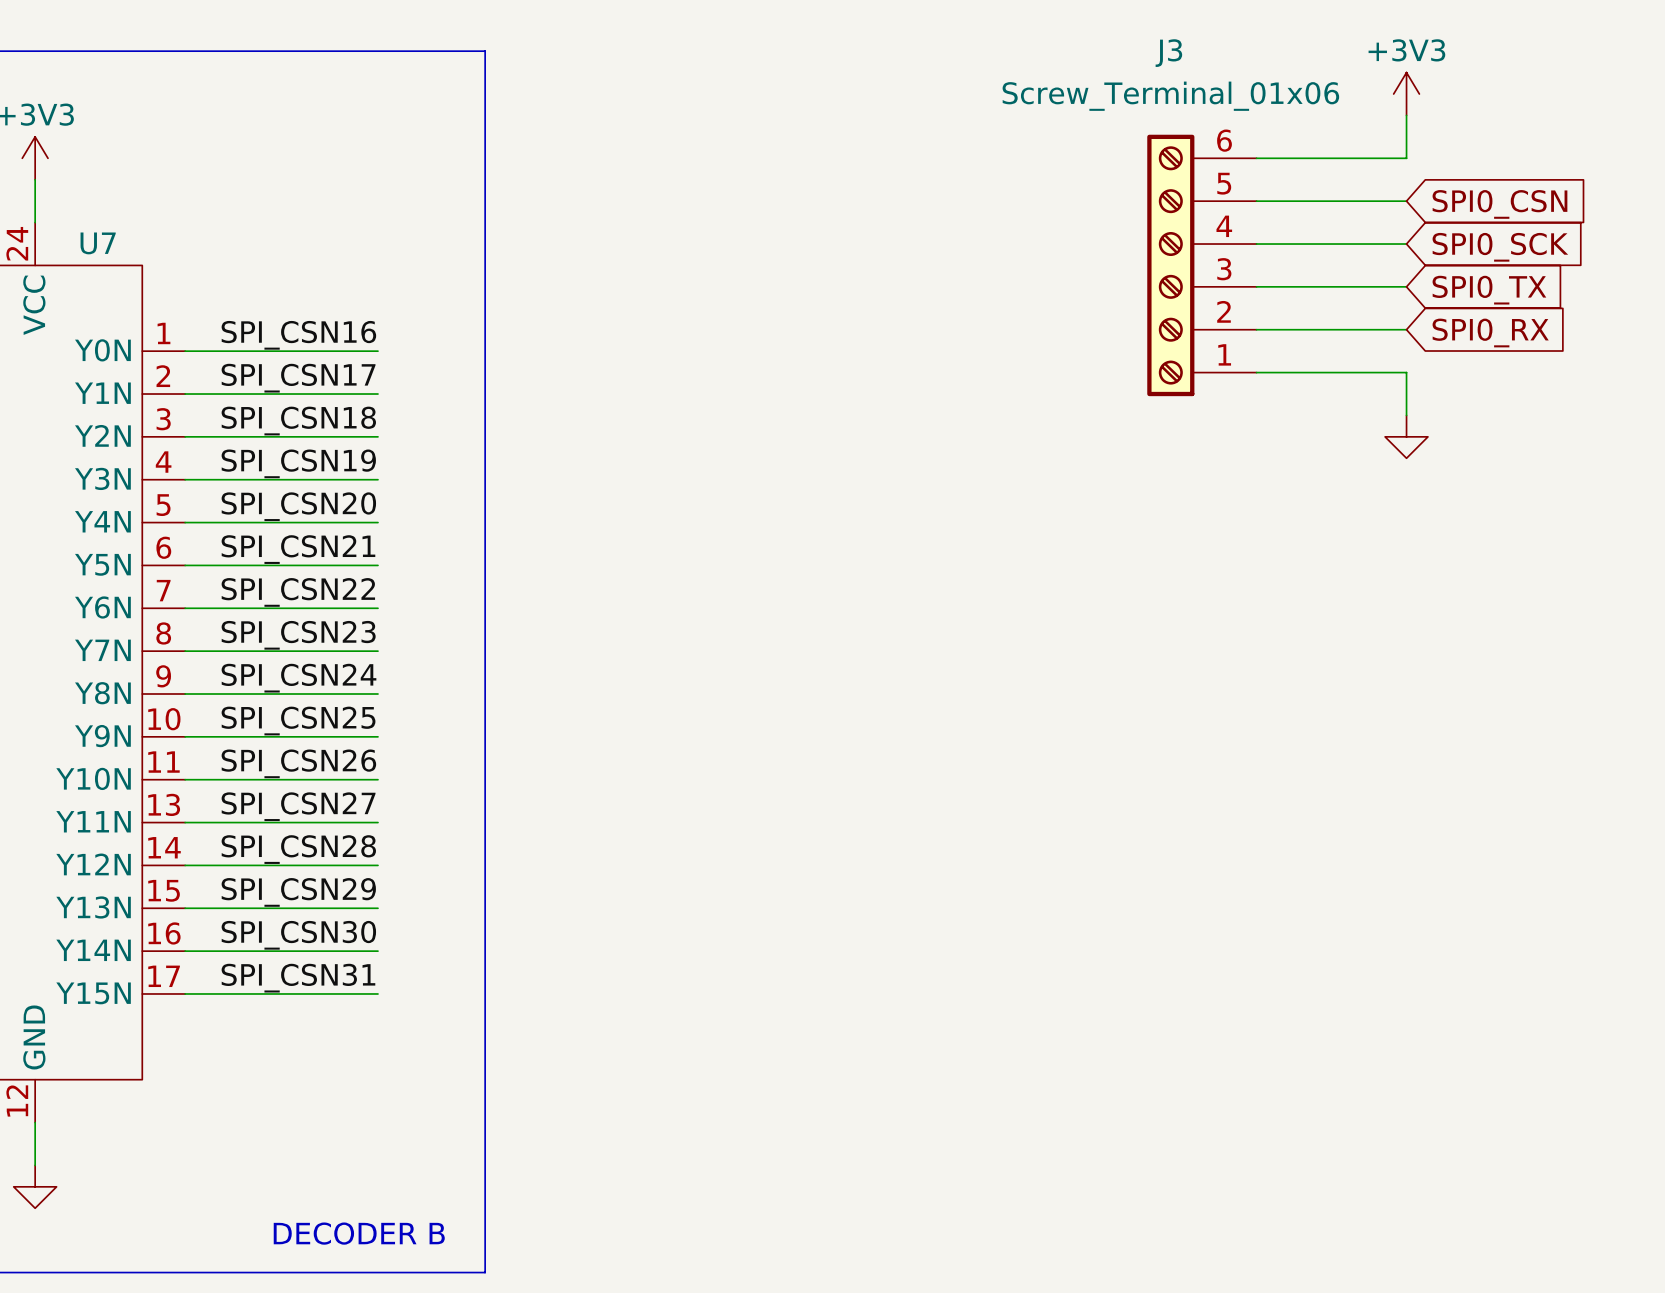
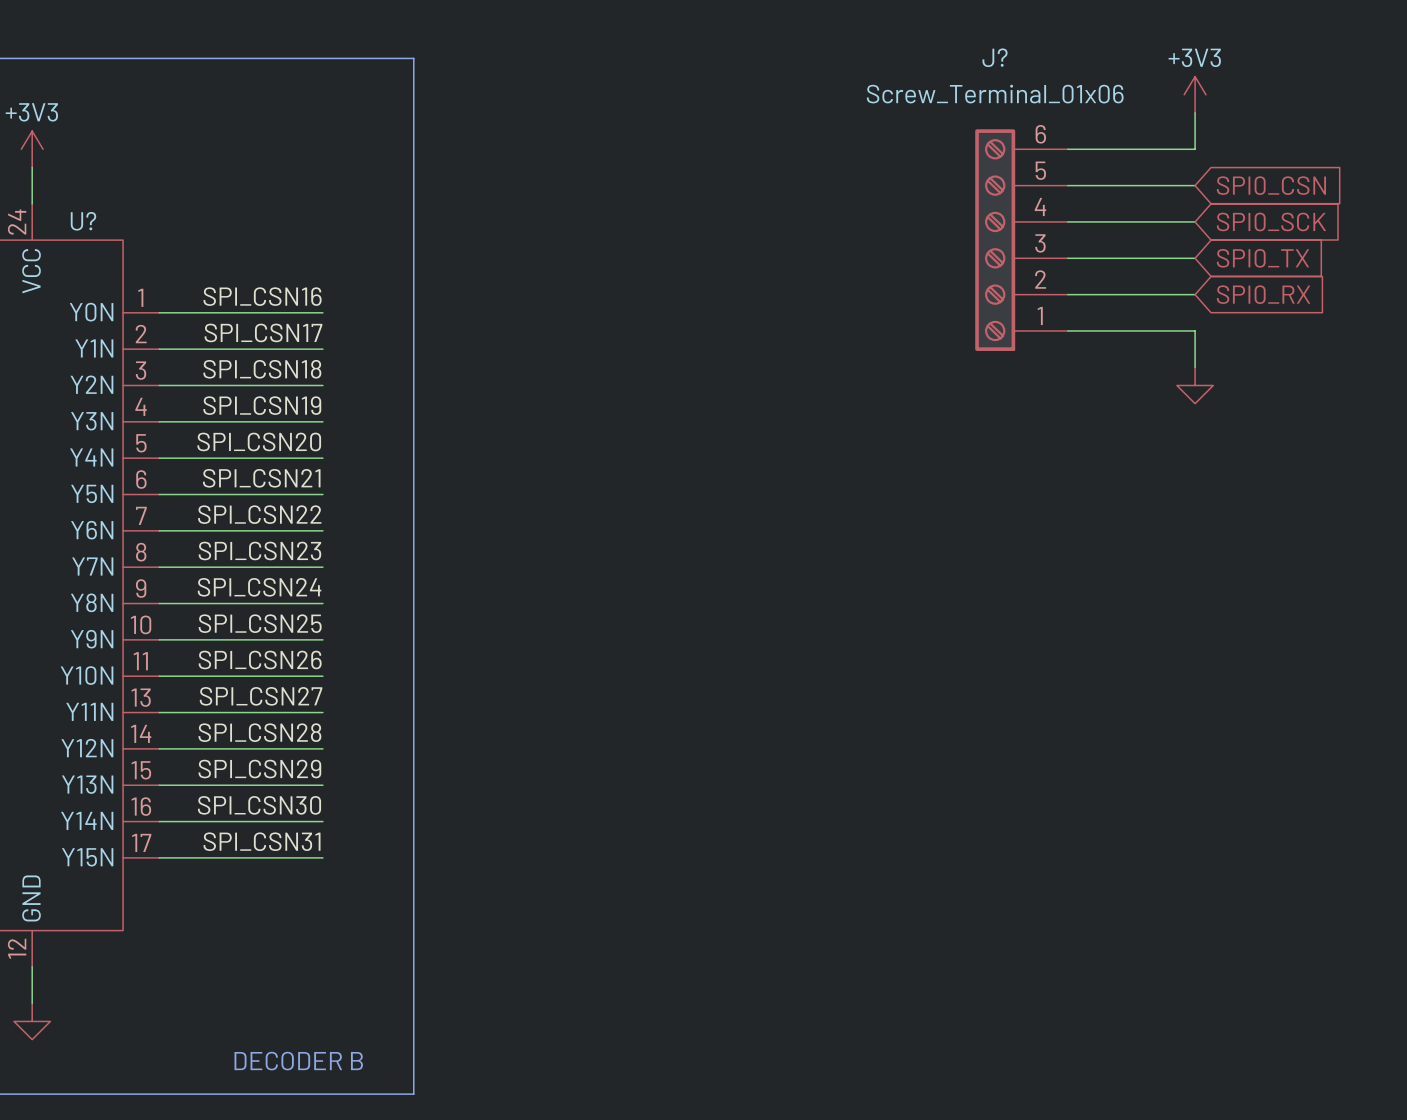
J3 name: J3 (1168, 53) -> J? (995, 57)
U7 name: U7 (98, 243) -> U? (83, 221)

